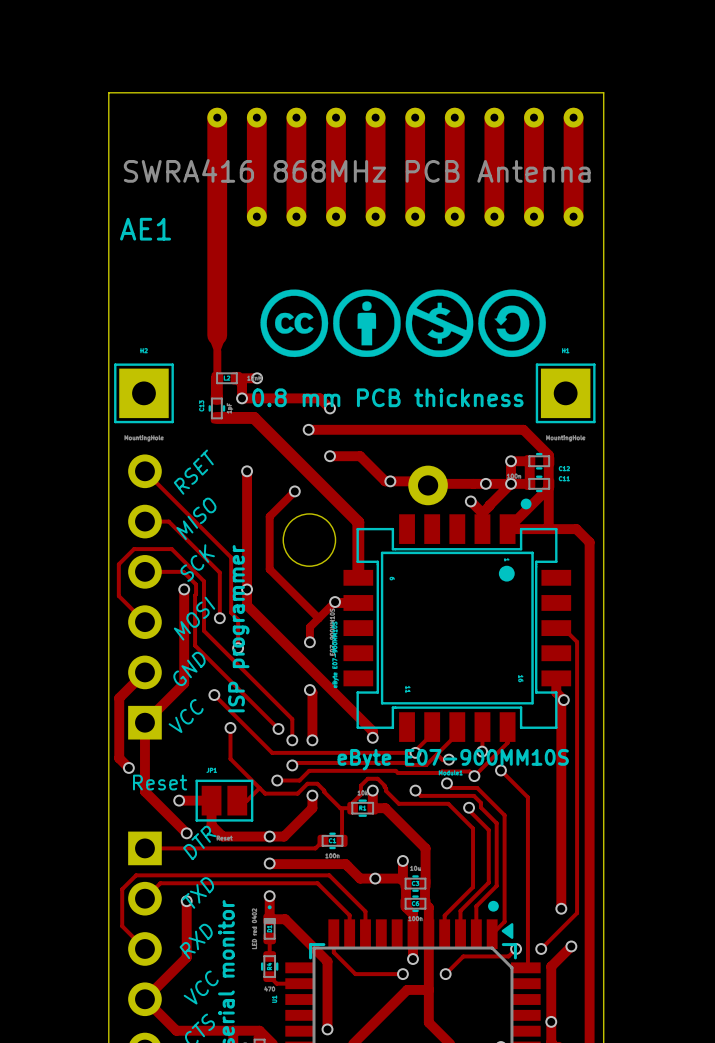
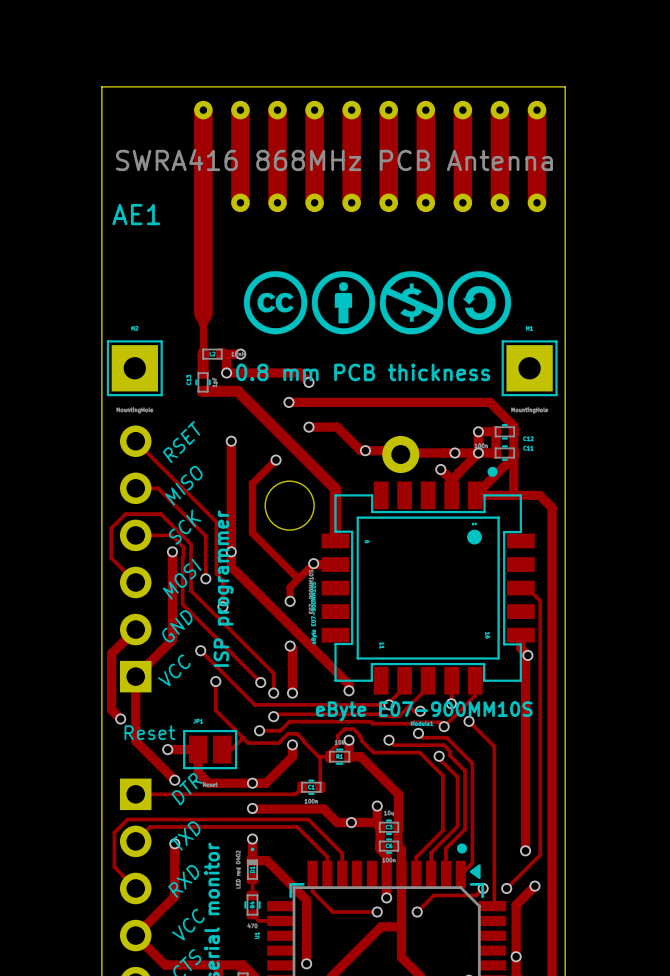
part footprint: [343, 514, 572, 742] -> [321, 481, 535, 695]

